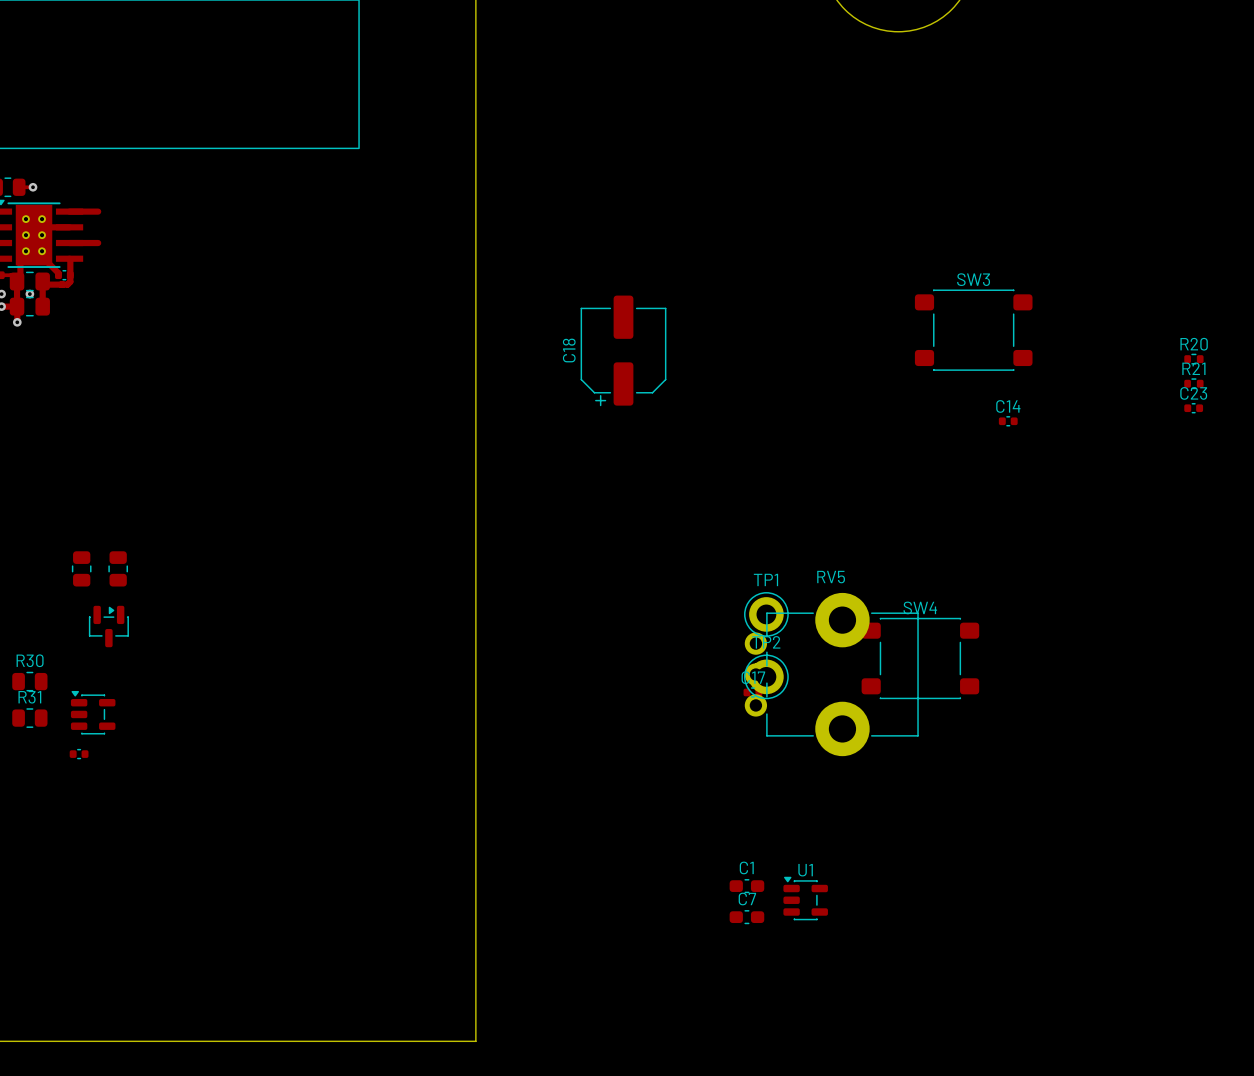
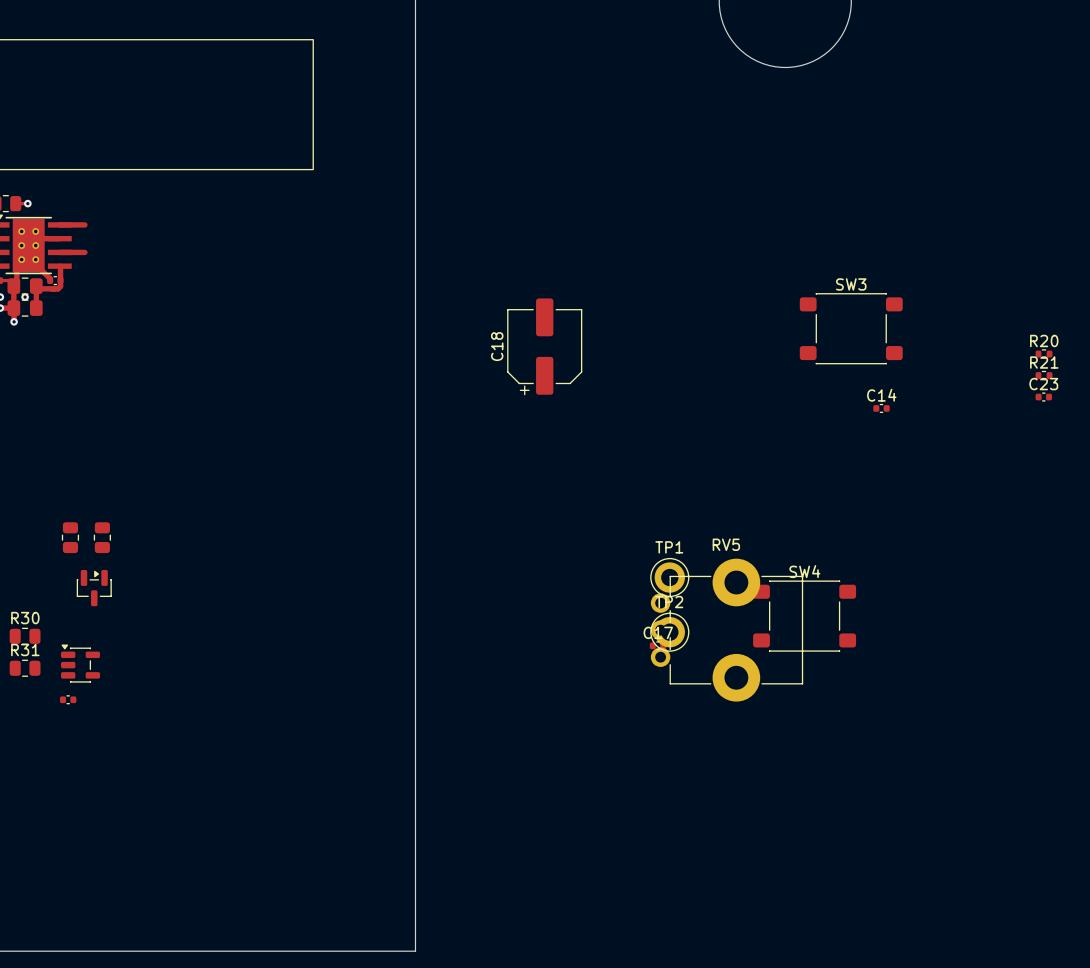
C1: (746, 886) -> none
U1: (805, 898) -> none
C7: (746, 917) -> none

